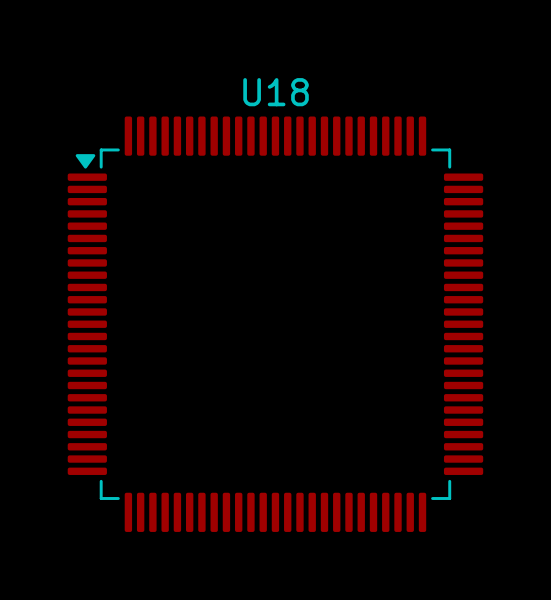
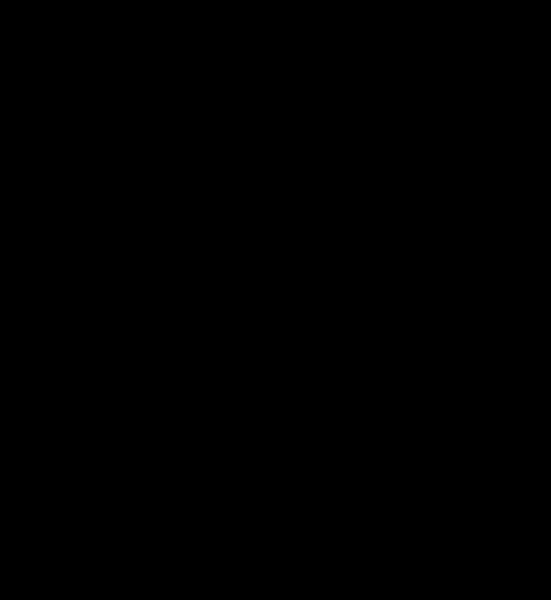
U18: (275, 324) -> none

